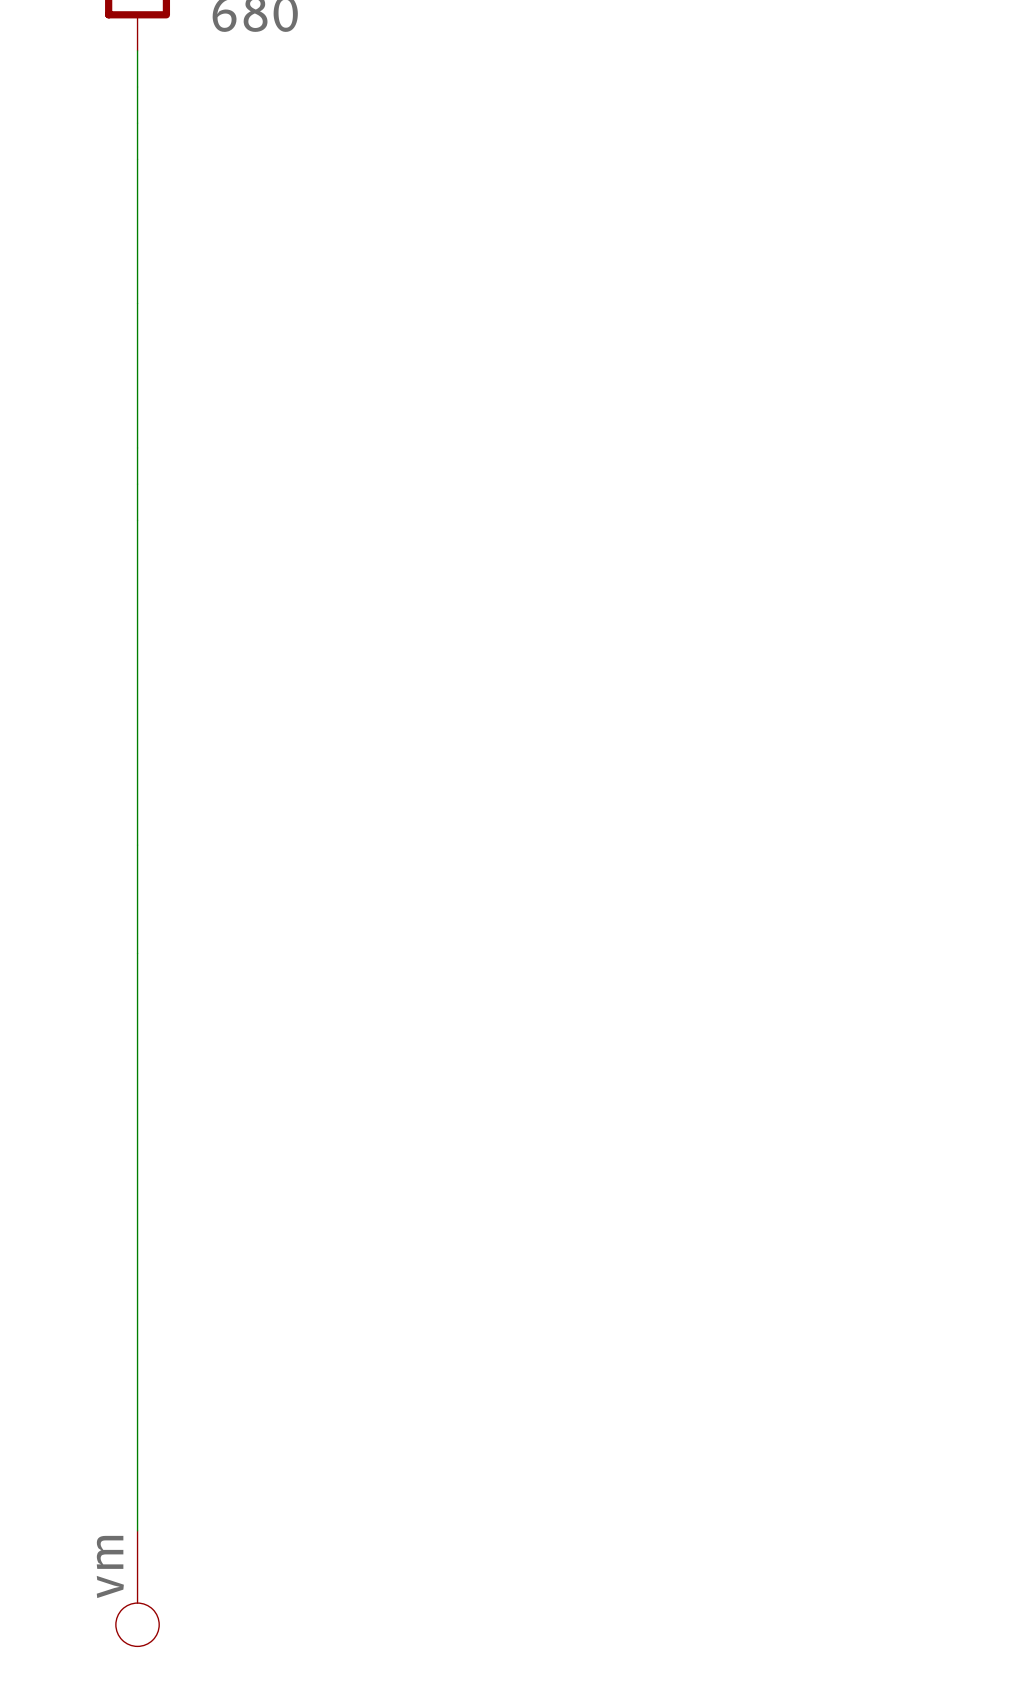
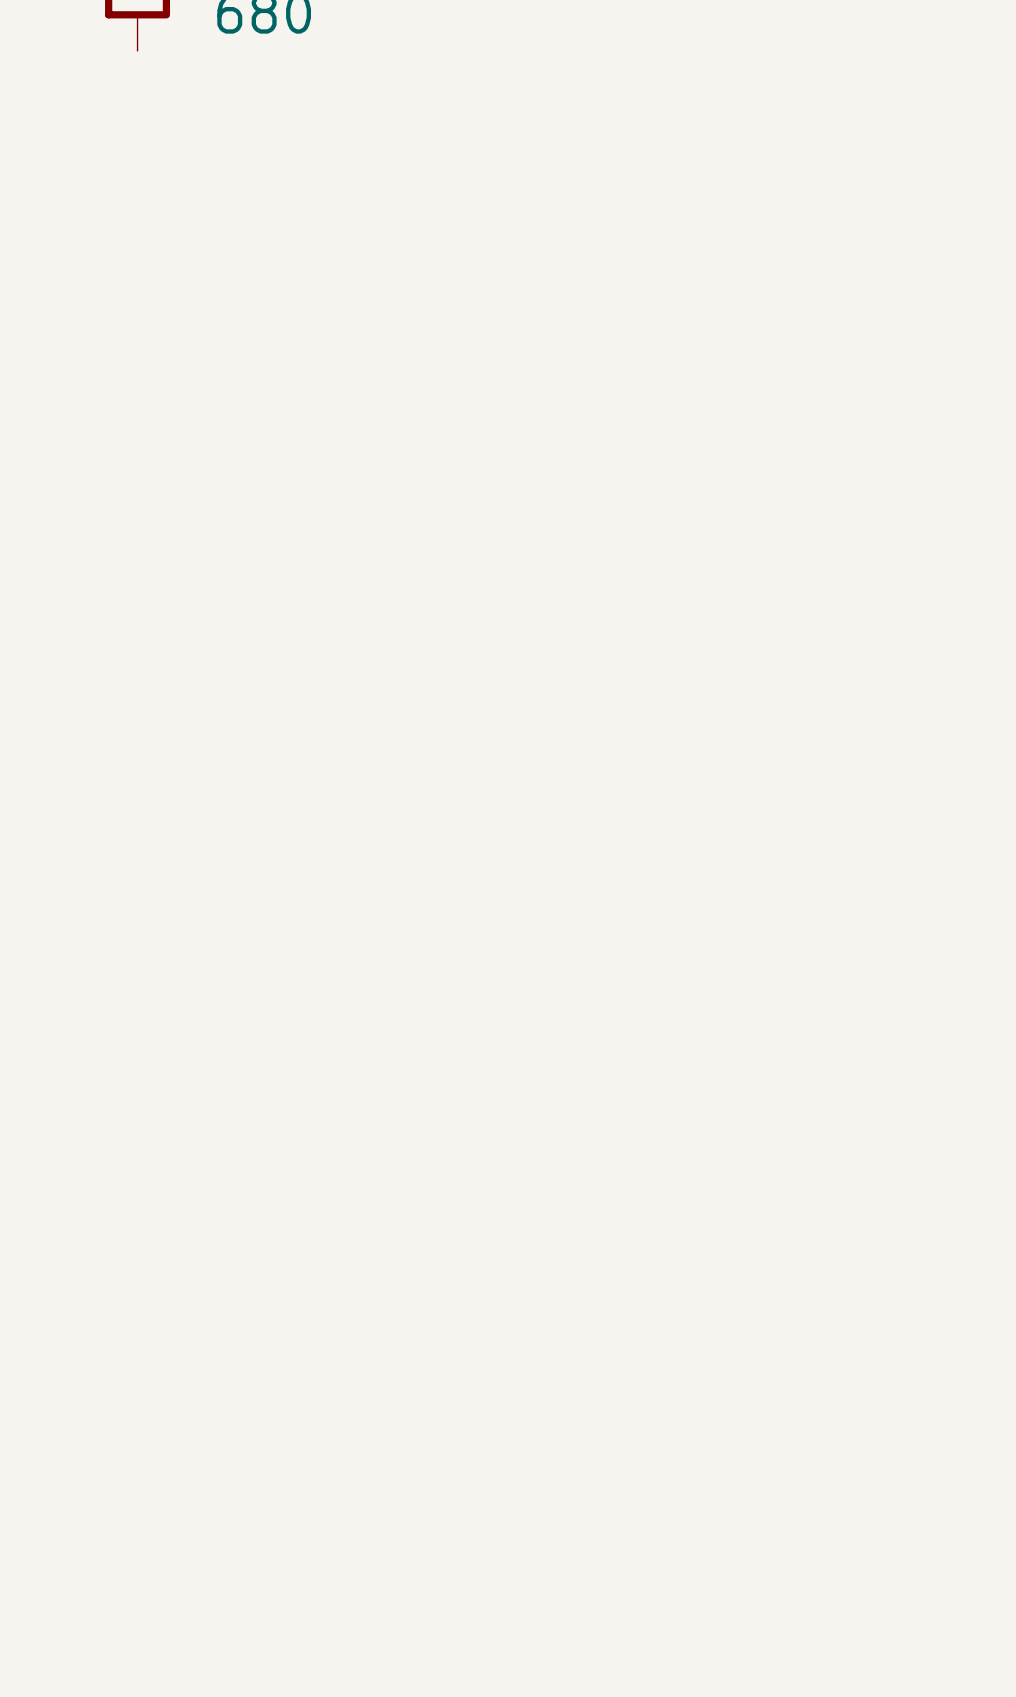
wire: (137, 50) (137, 1530) -> none
label: vm (110, 1566) -> none
part: (137, 1588) -> none

